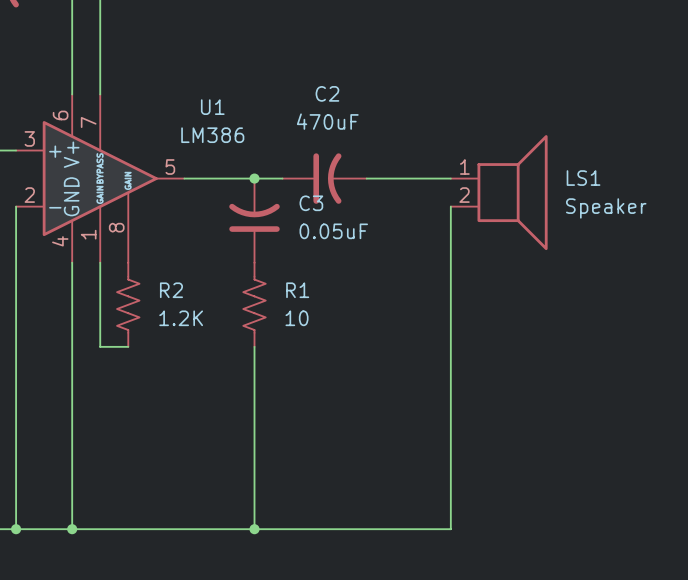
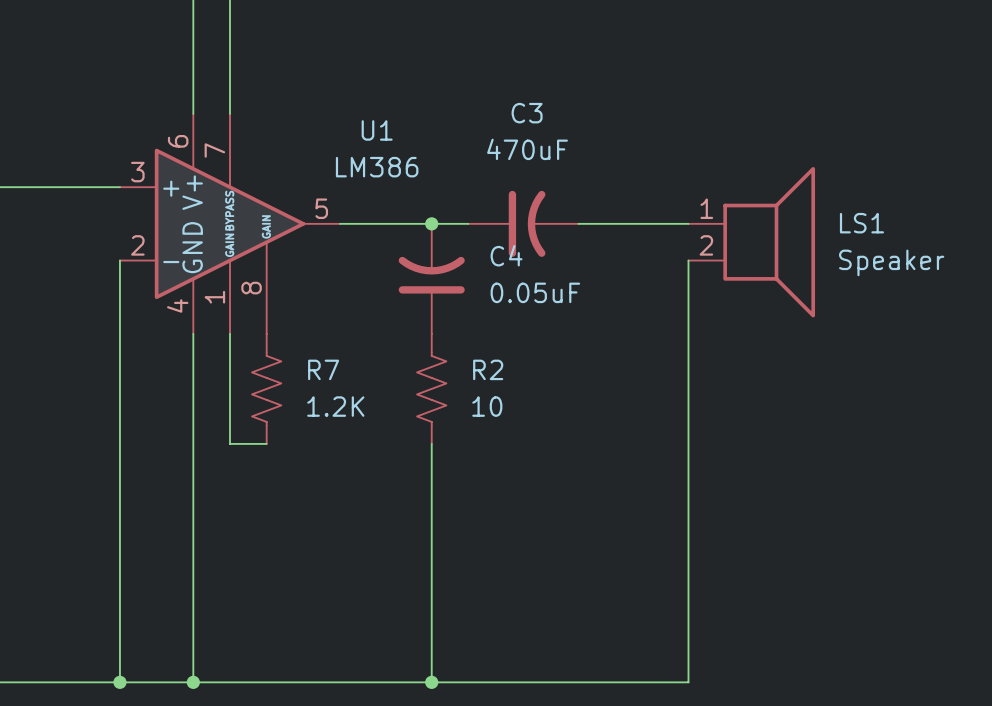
C2 name: C2 (327, 93) -> C3 (527, 113)
C3 name: C3 (311, 203) -> C4 (506, 255)
R2 name: R2 (171, 290) -> R7 (323, 369)
R1 name: R1 (297, 290) -> R2 (488, 369)

